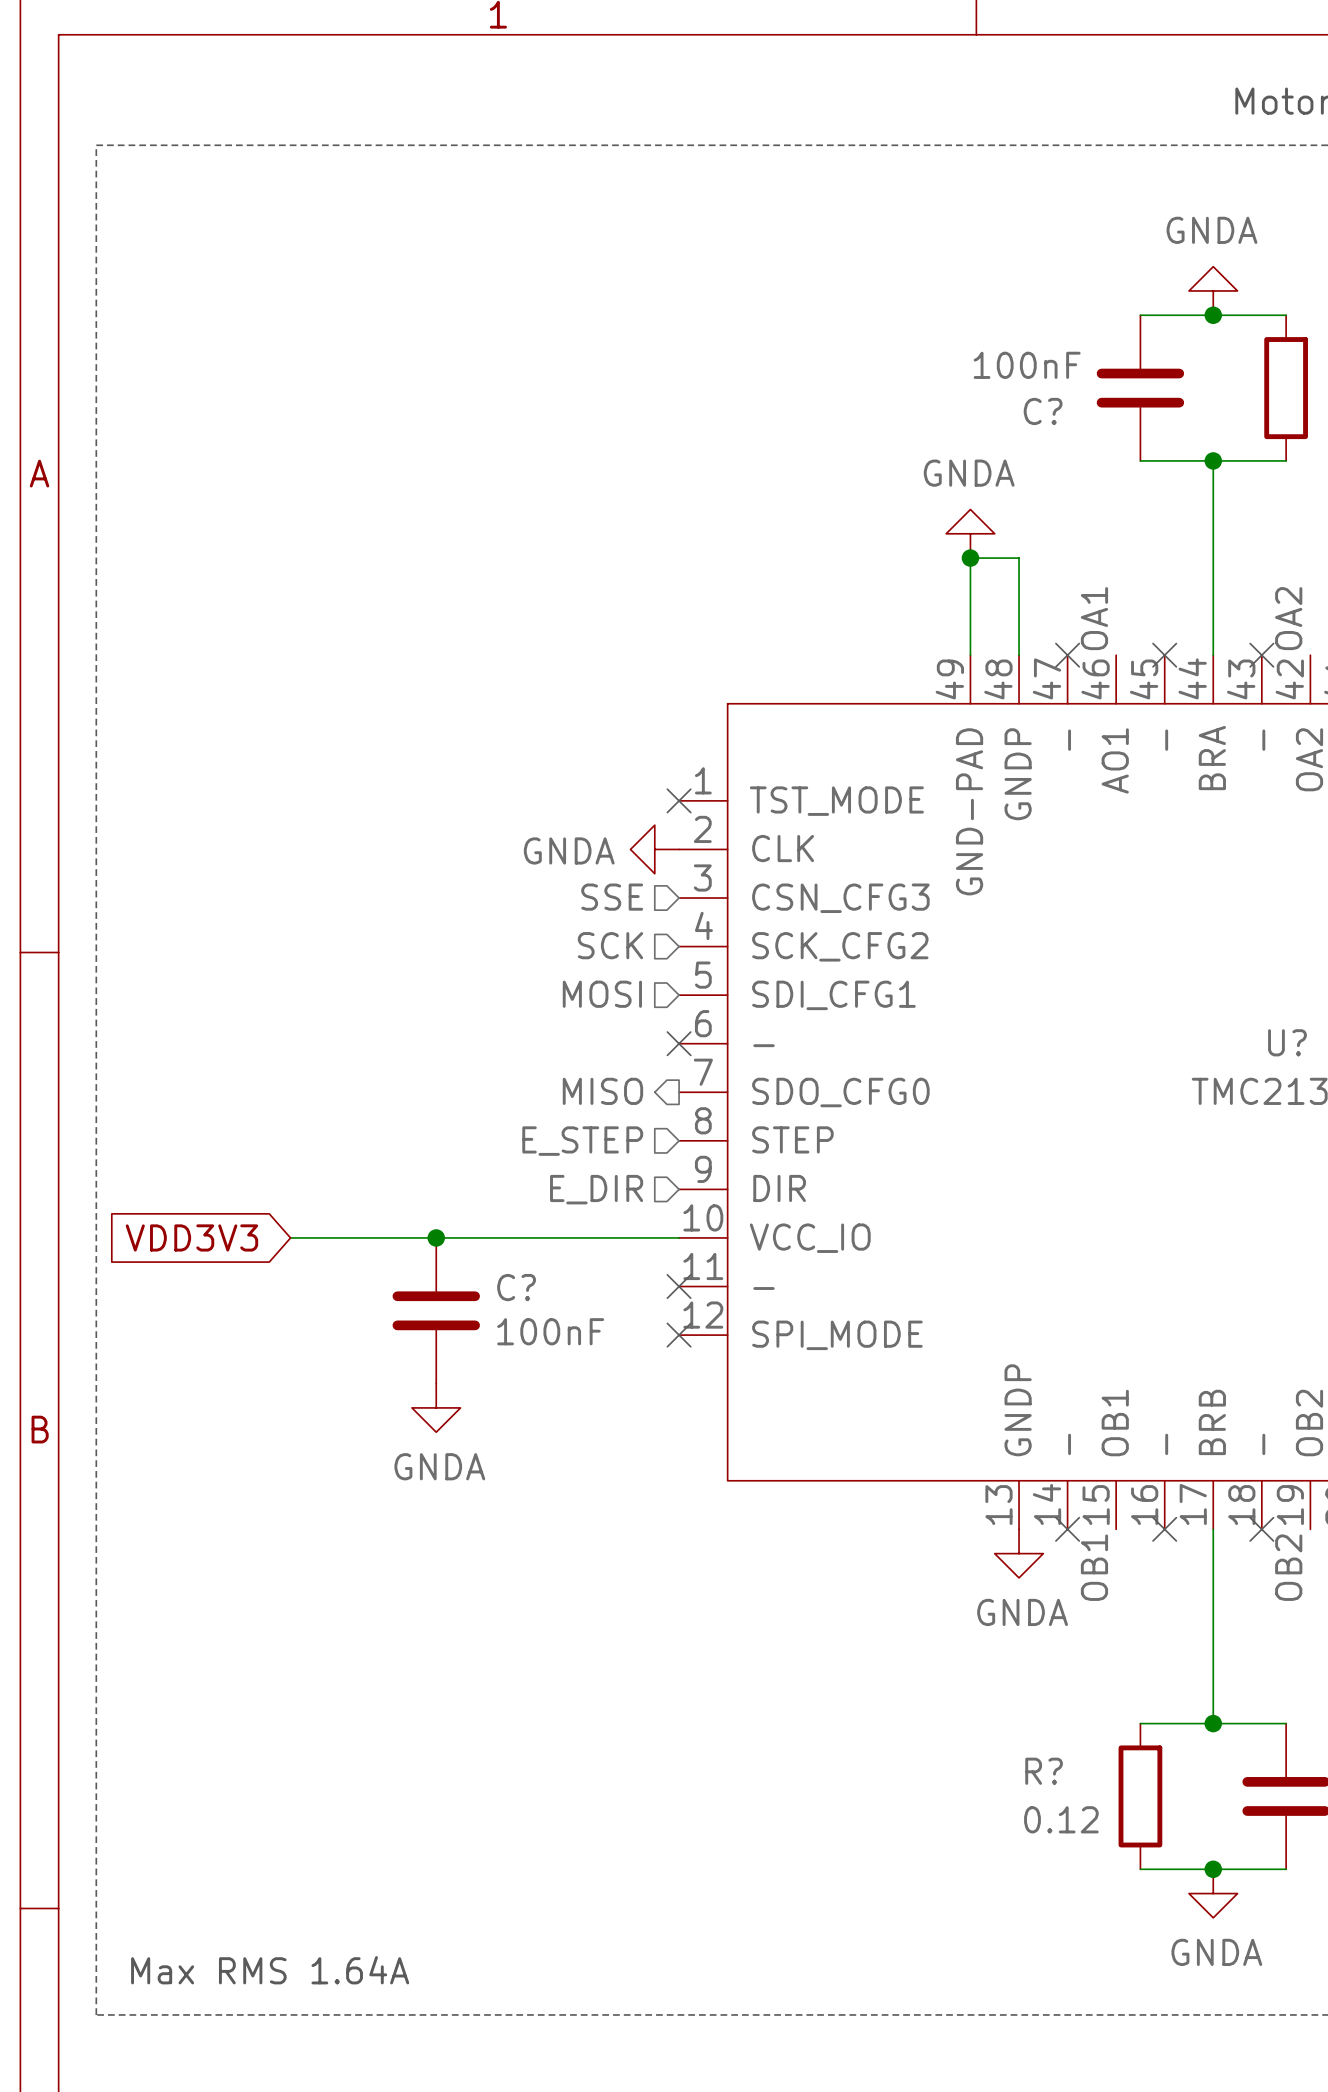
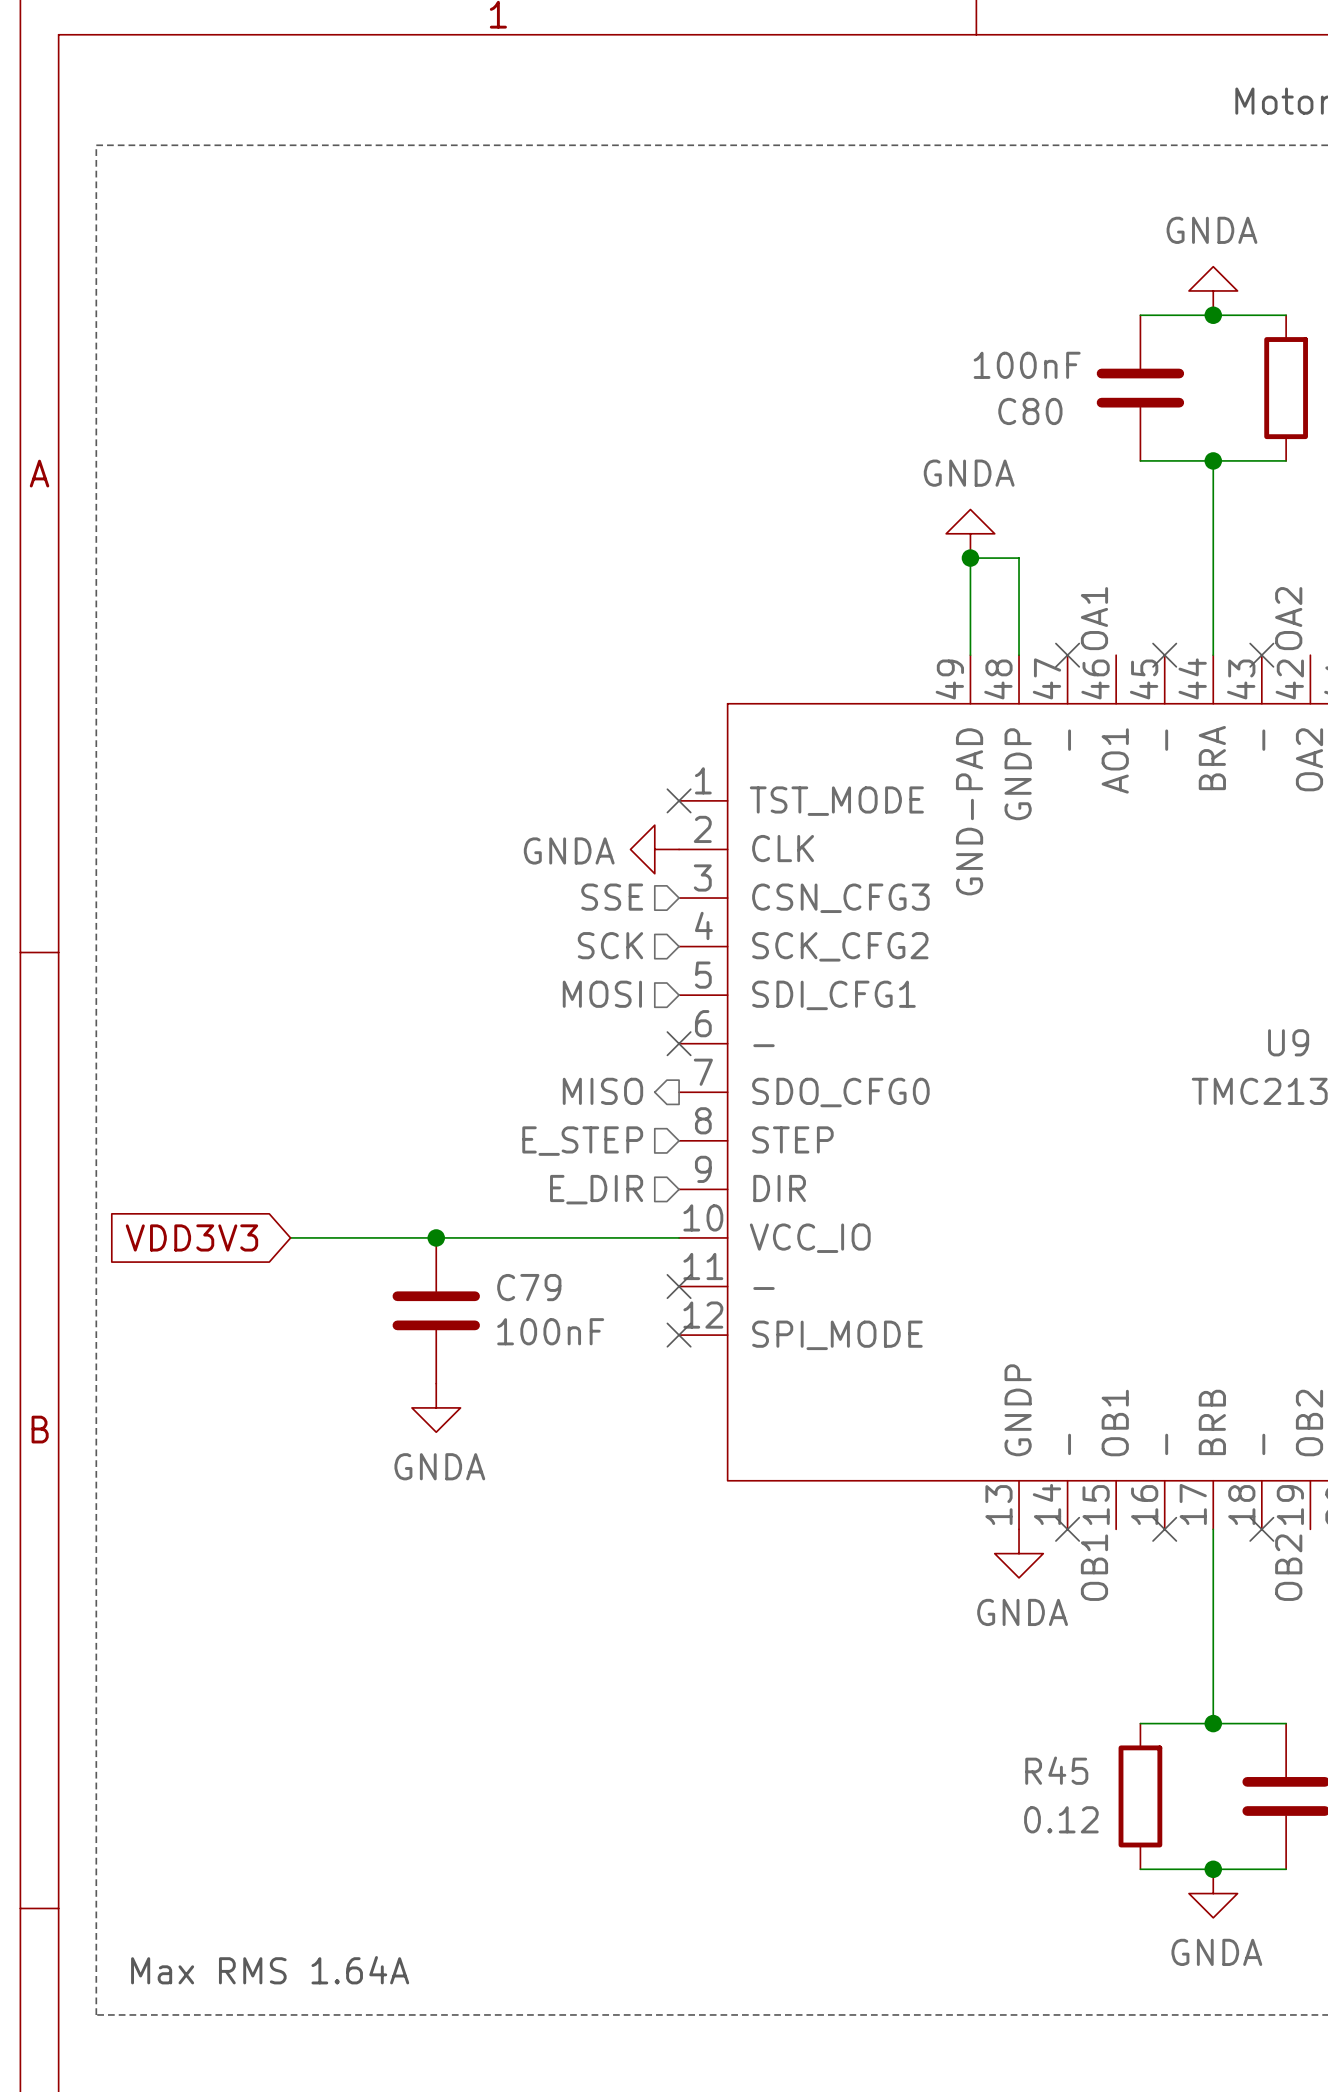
C? name: C? (1043, 411) -> C80 (1030, 411)
U? name: U? (1287, 1042) -> U9 (1288, 1042)
C? name: C? (516, 1287) -> C79 (529, 1287)
R? name: R? (1044, 1771) -> R45 (1056, 1770)

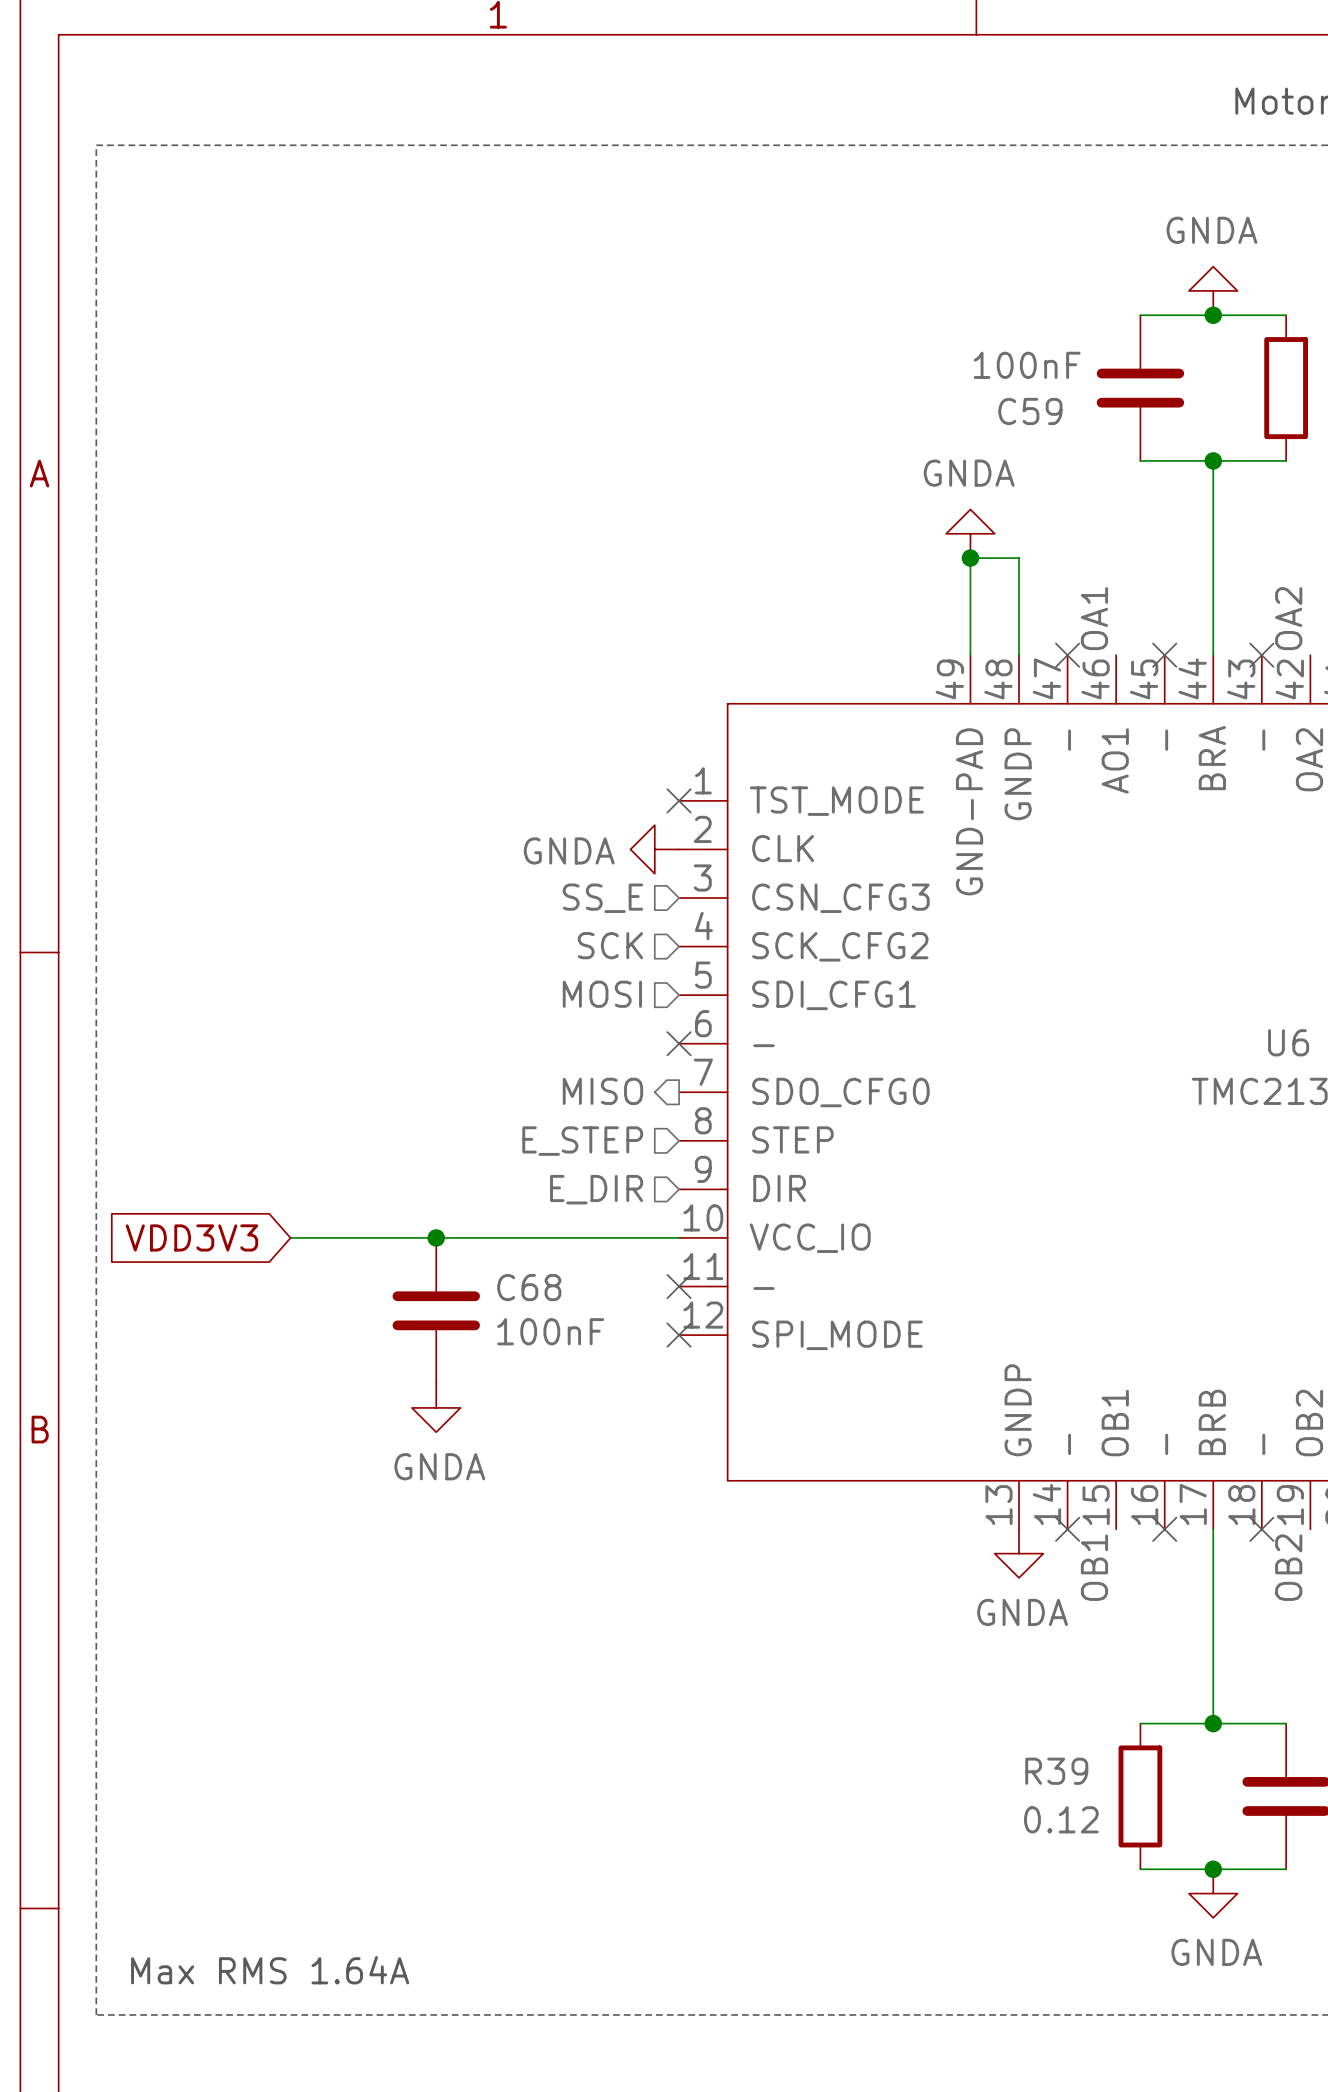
C80 name: C80 (1030, 411) -> C59 (1030, 411)
hierarchical label: SSE (612, 897) -> SS_E (602, 898)
U9 name: U9 (1288, 1042) -> U6 (1288, 1042)
C79 name: C79 (529, 1287) -> C68 (529, 1287)
R45 name: R45 (1056, 1770) -> R39 (1056, 1771)

